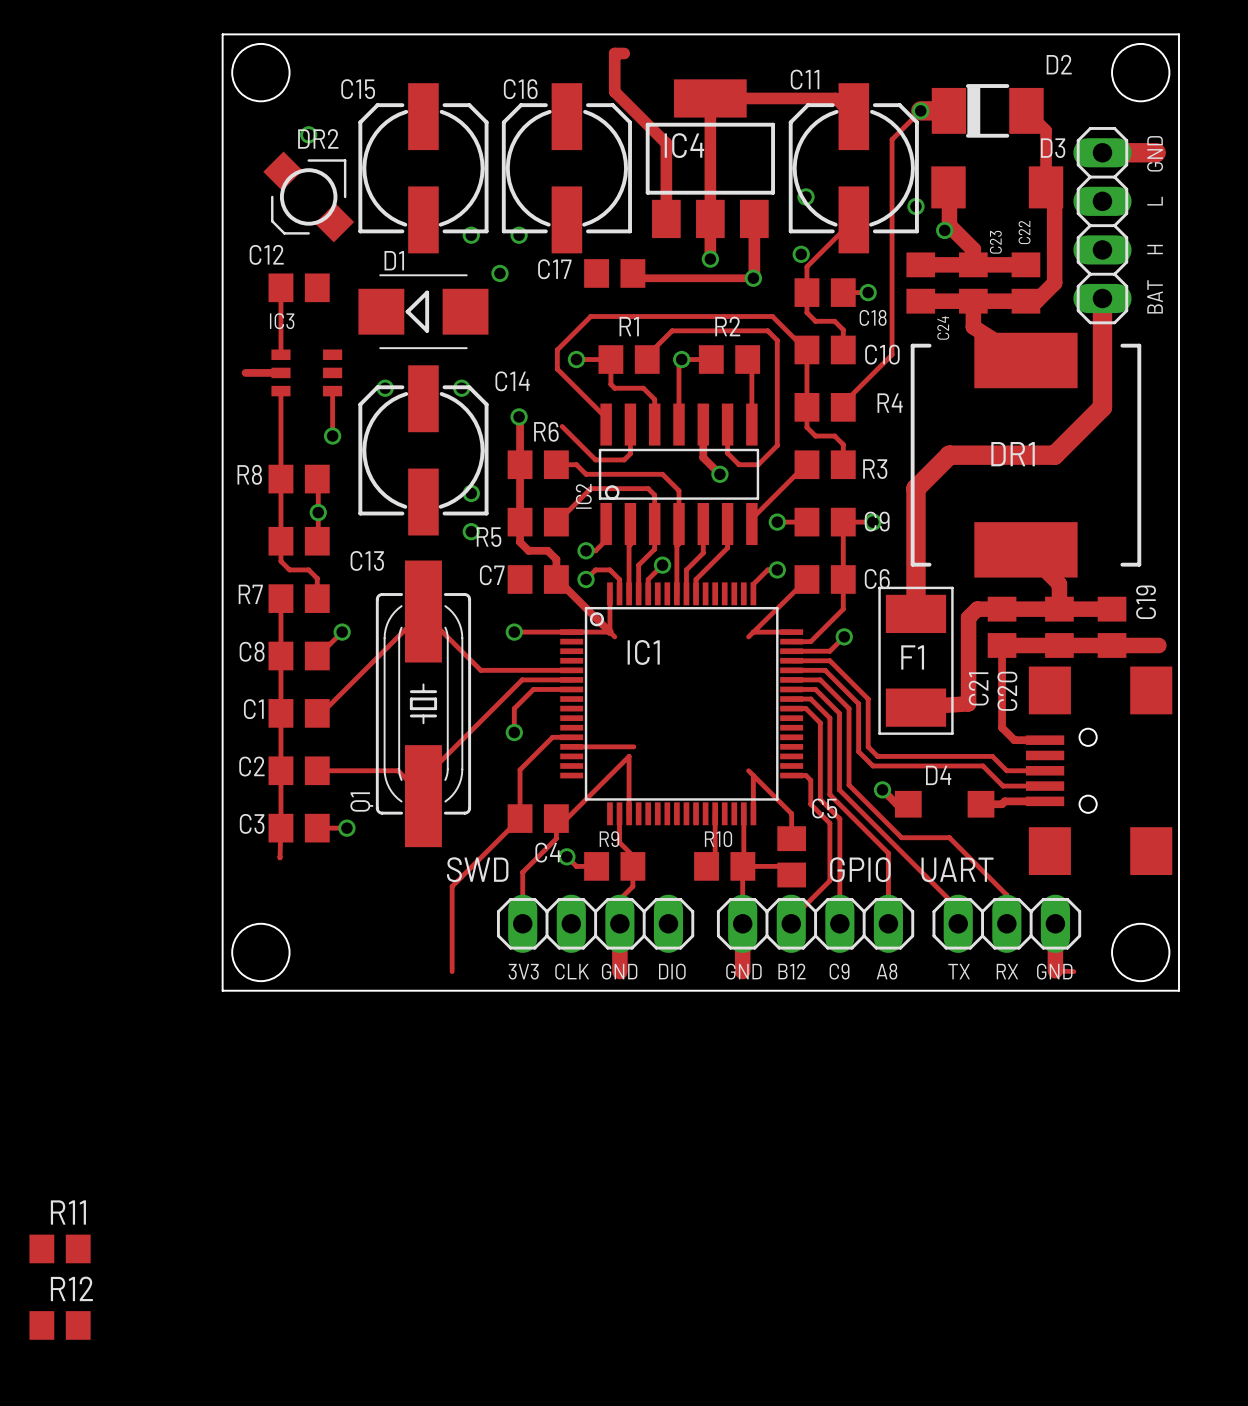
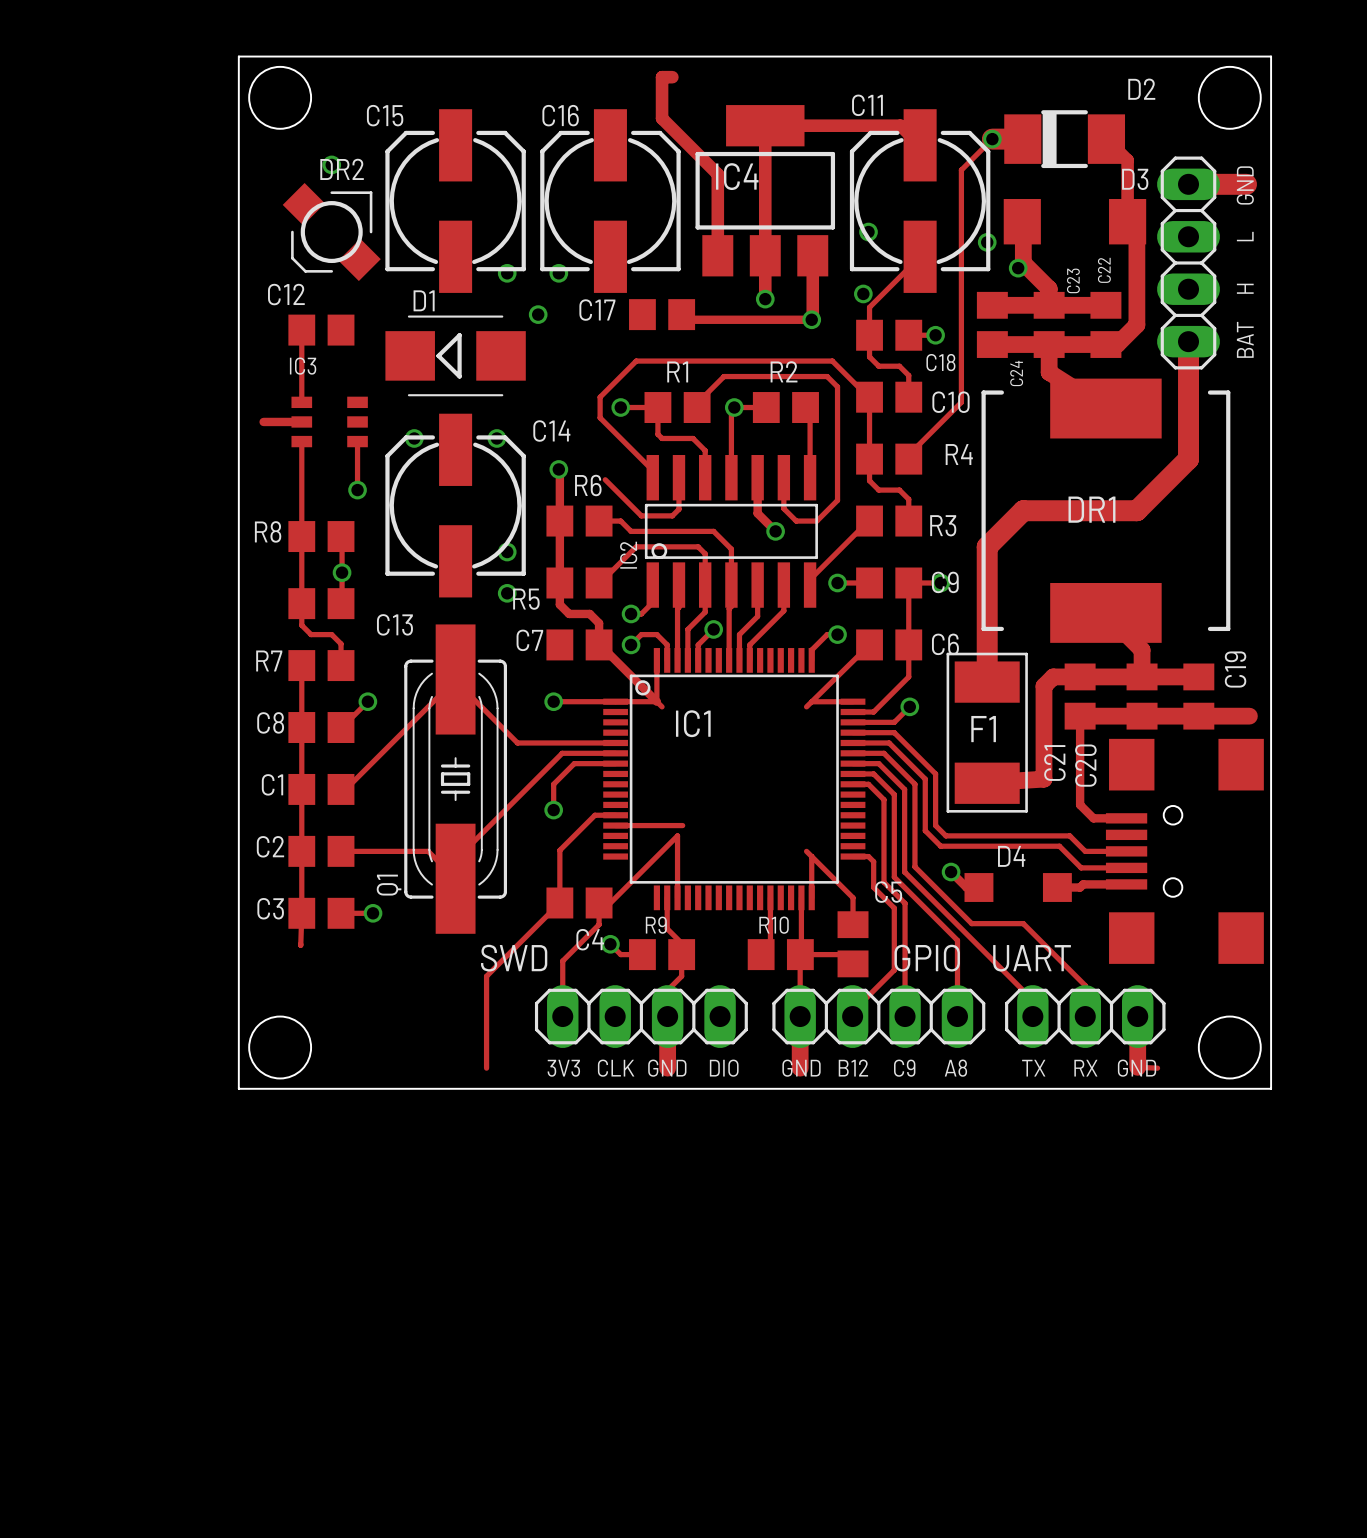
R11: (60, 1248) -> none
R12: (60, 1325) -> none

